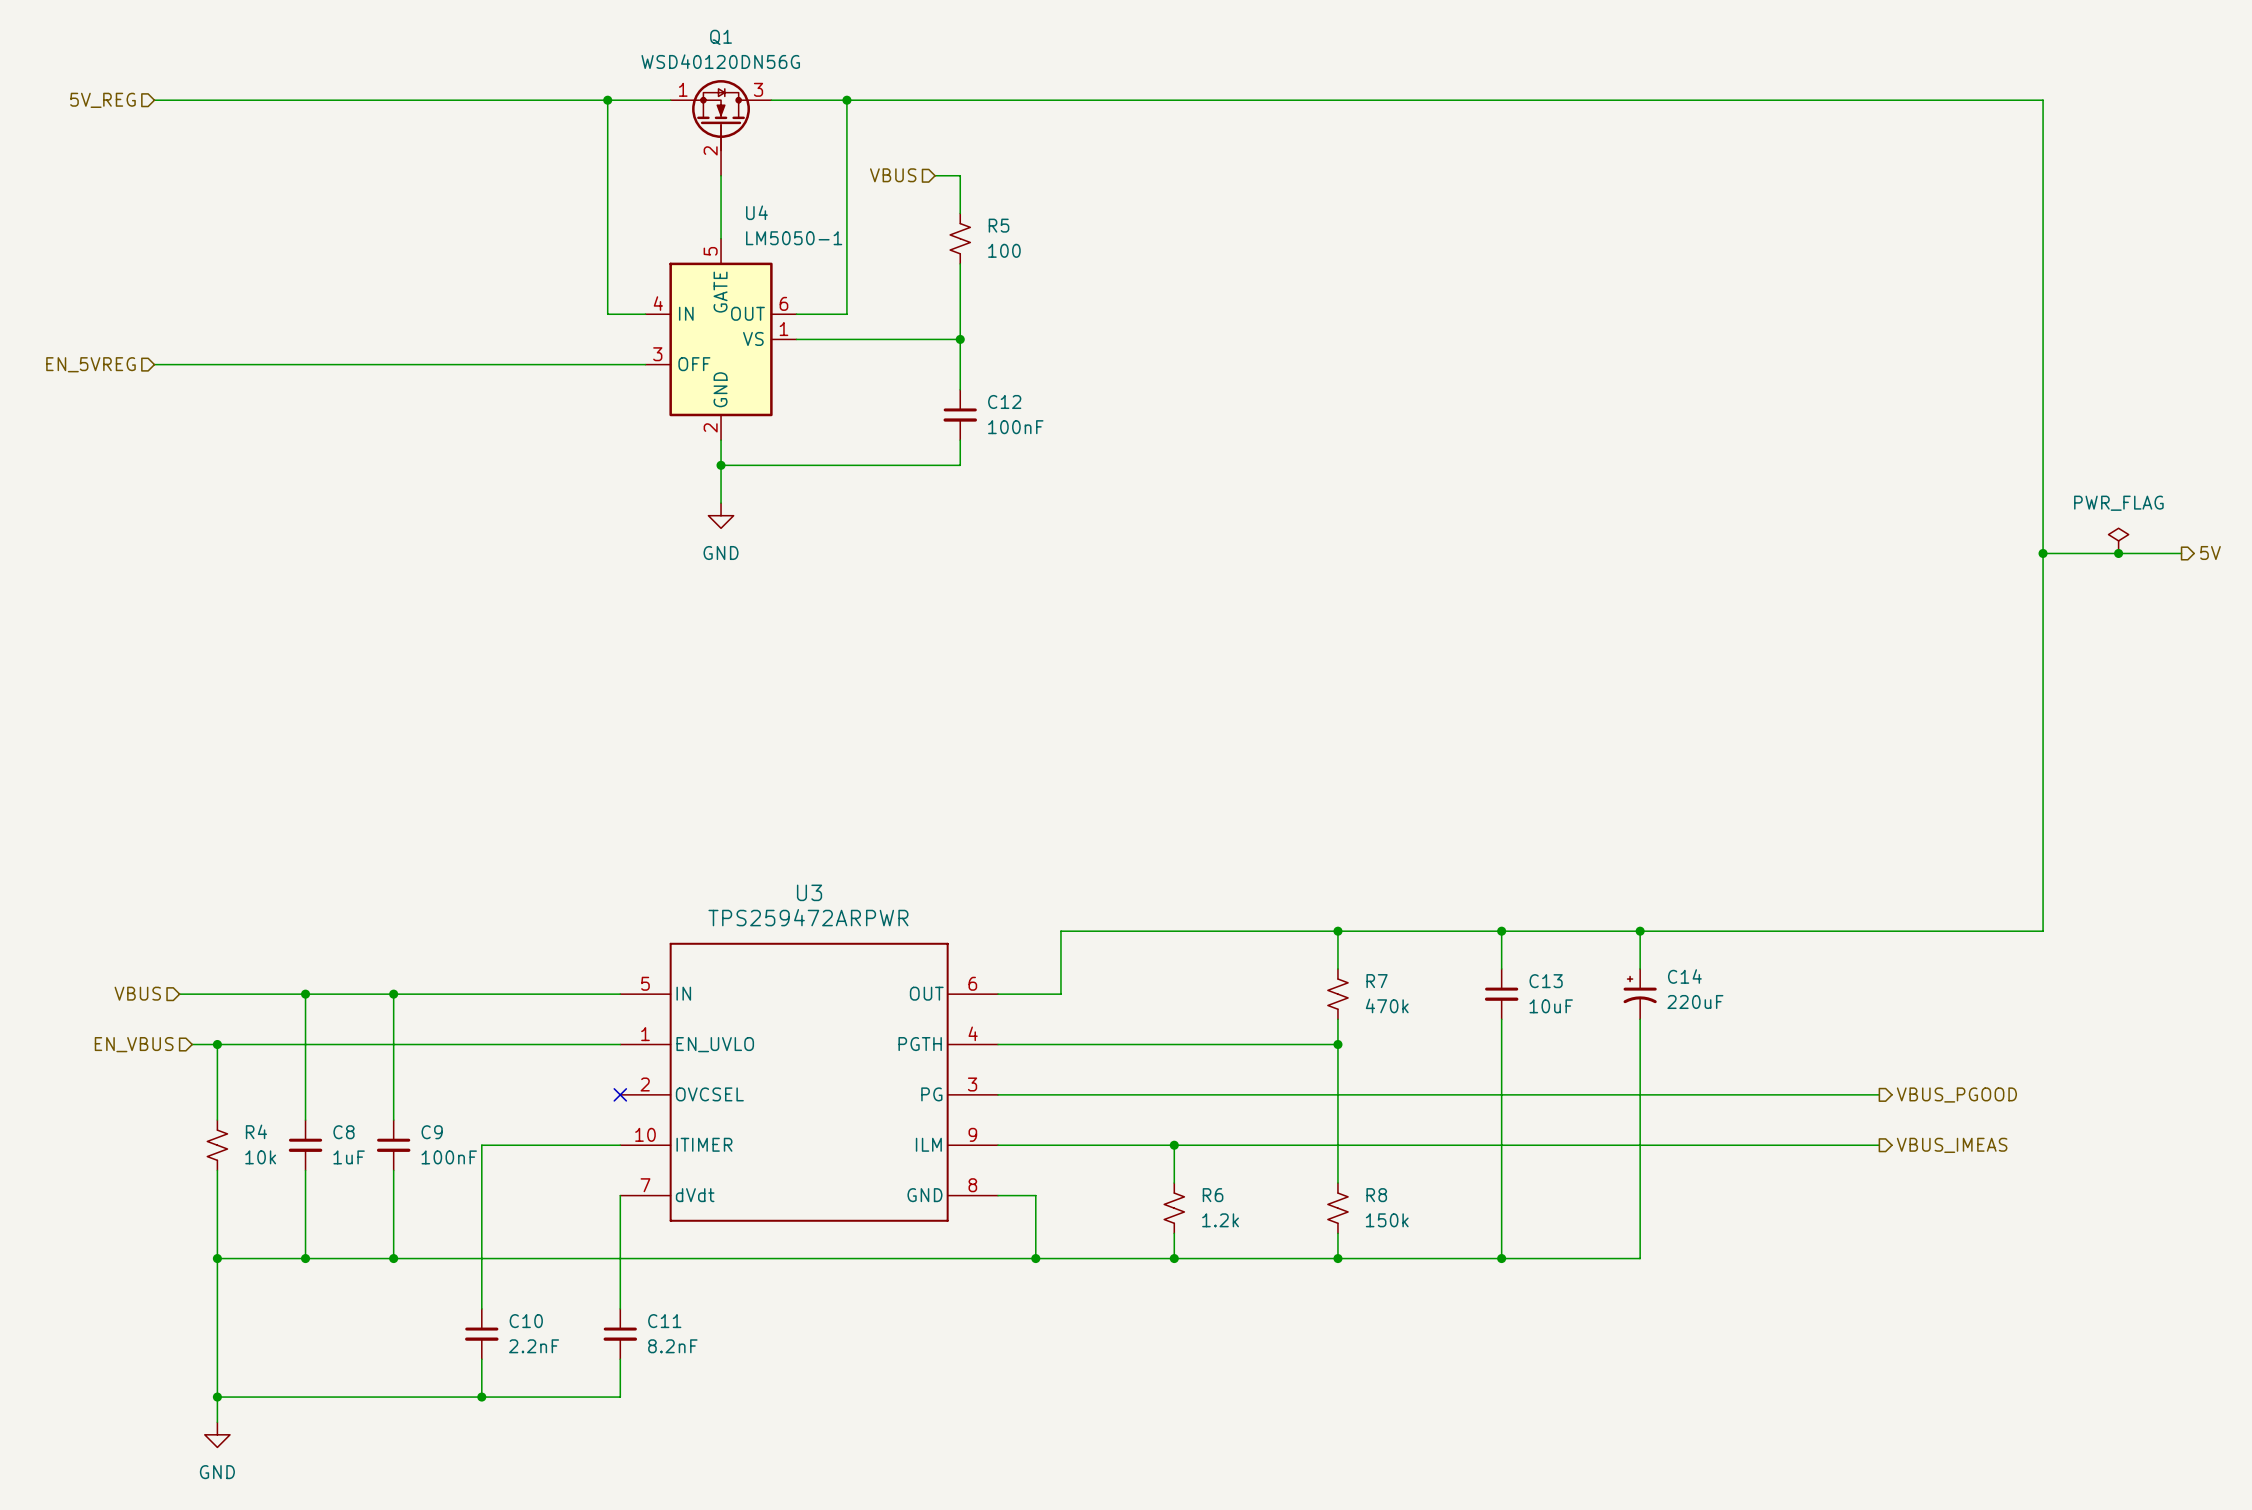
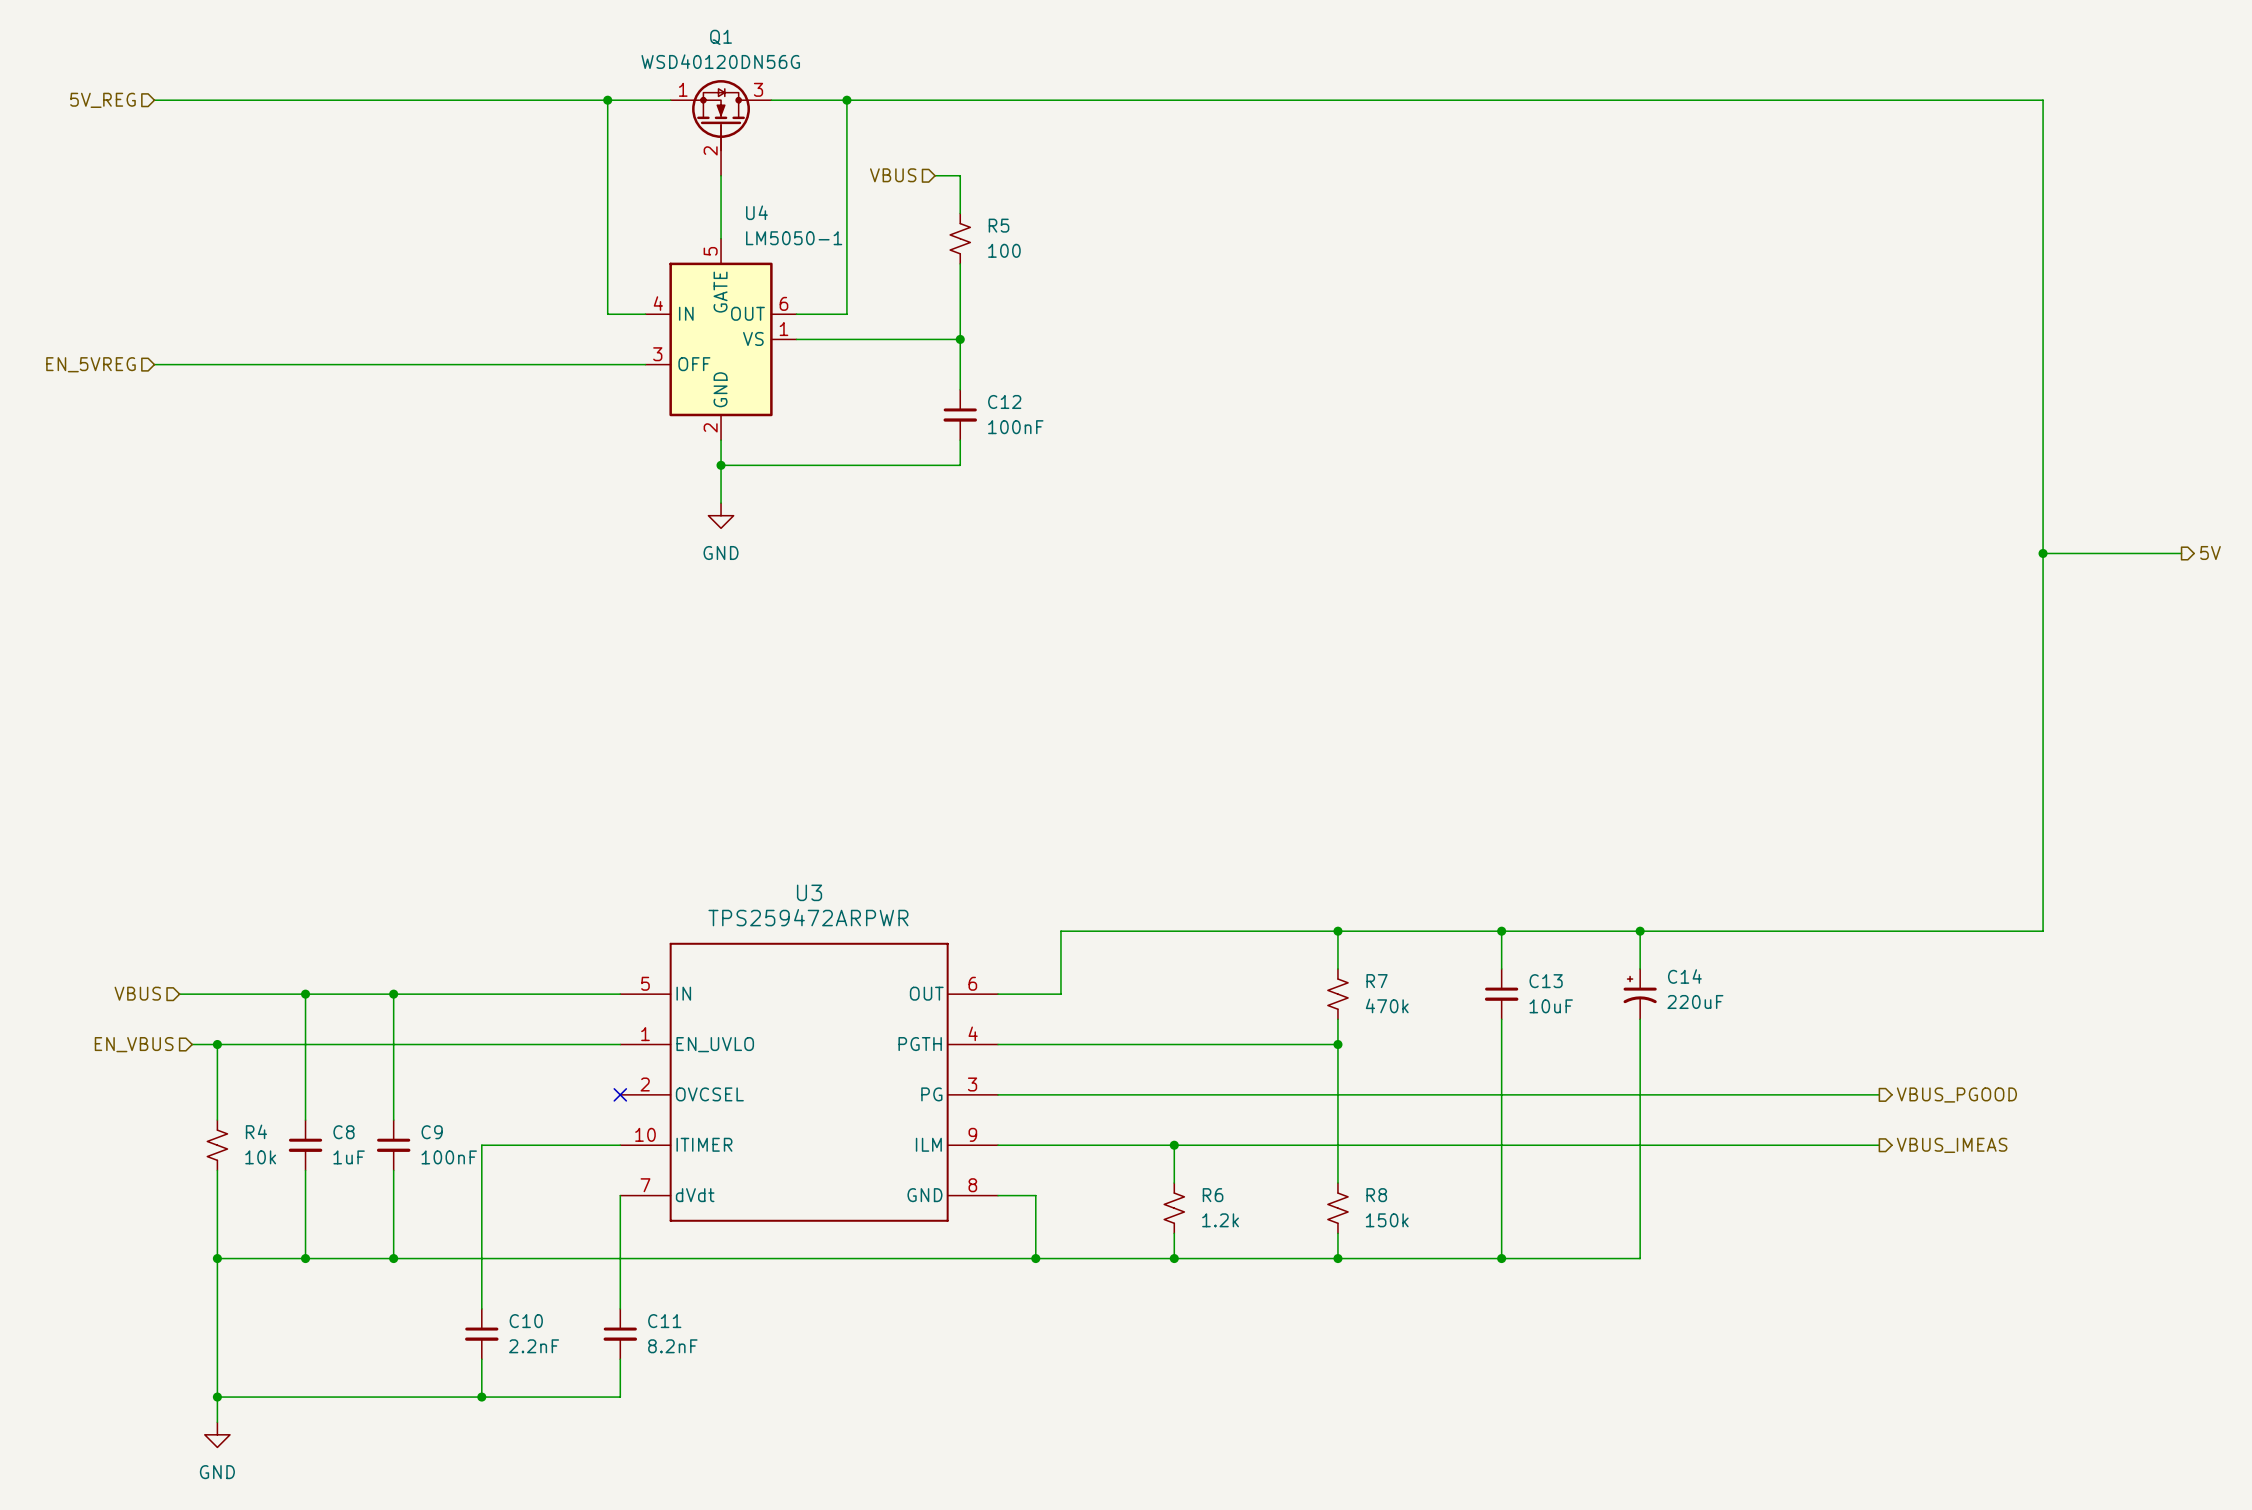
power symbol: PWR_FLAG (2118, 540) -> none
junction: (2118, 553) -> none

